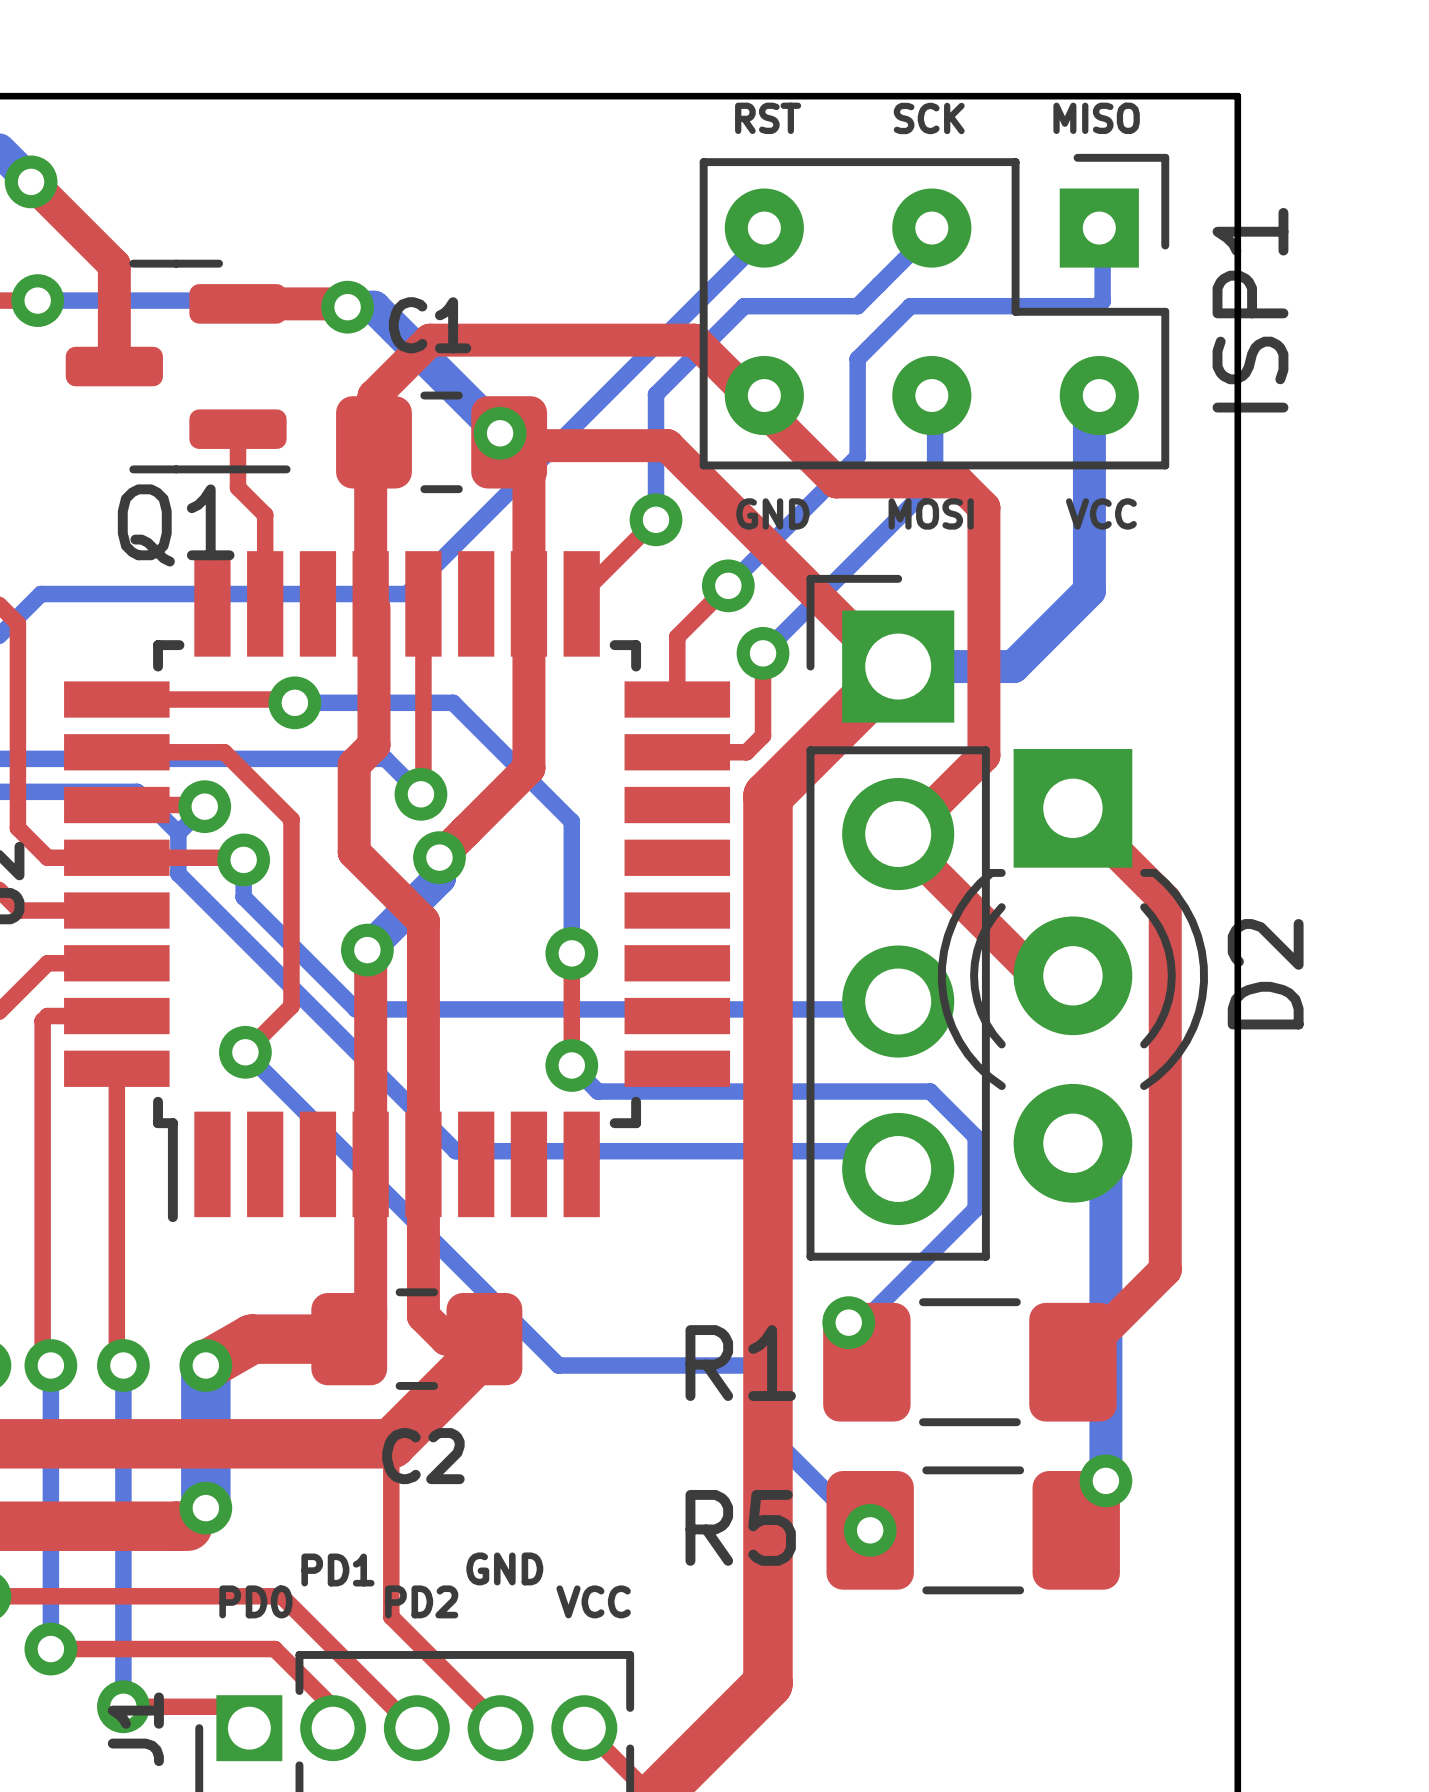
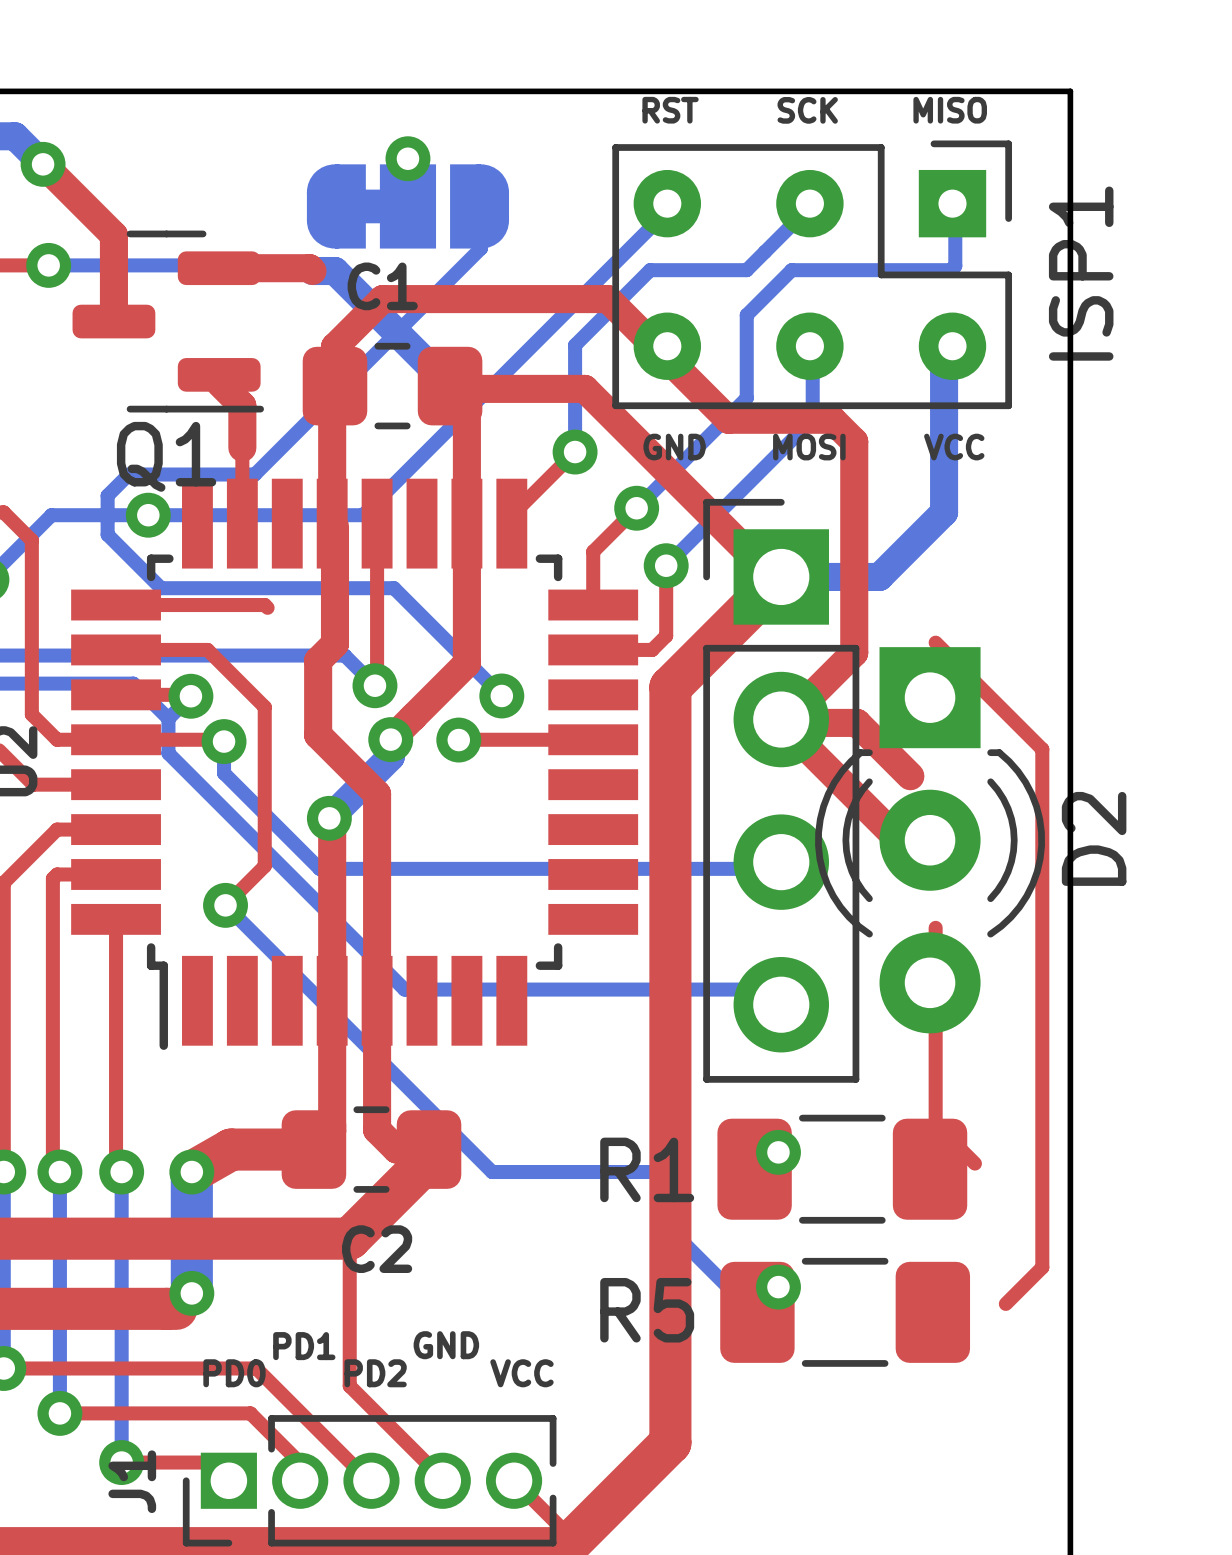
via: none -> (407, 158)
part: none -> (407, 206)
bottom track: none -> (480, 206) (480, 248) (254, 474) (128, 474) (107, 495) (107, 534) (161, 588) (394, 588) (501, 695)
via: (347, 307) -> none
top track: (237, 429) (237, 487) (265, 514) -> (219, 383) (242, 405) (242, 447)
via: (500, 433) -> none
via: none -> (148, 515)
bottom track: (294, 702) (453, 702) (571, 821) (571, 953) -> none
via: (294, 702) -> none
top track: none -> (935, 642) (1042, 749) (1042, 1267) (1005, 1303)
via: none -> (501, 695)
top track: (1072, 808) (1165, 900) (1165, 1269) (1072, 1362) -> none
top track: none -> (784, 722) (857, 722) (910, 776)
top track: none -> (459, 739) (610, 739)
via: none -> (458, 740)
top track: (571, 953) (571, 1065) -> none
via: (571, 953) -> none
bottom track: (571, 1065) (597, 1091) (930, 1091) (975, 1136) (975, 1208) (861, 1322) (848, 1322) -> none
via: (571, 1065) -> none
top track: none -> (935, 927) (935, 1124) (974, 1163)
bottom track: (1072, 1143) (1105, 1176) (1105, 1480) -> none
via position: (848, 1322) -> (778, 1152)
via: (1105, 1480) -> none
via position: (870, 1530) -> (778, 1287)

